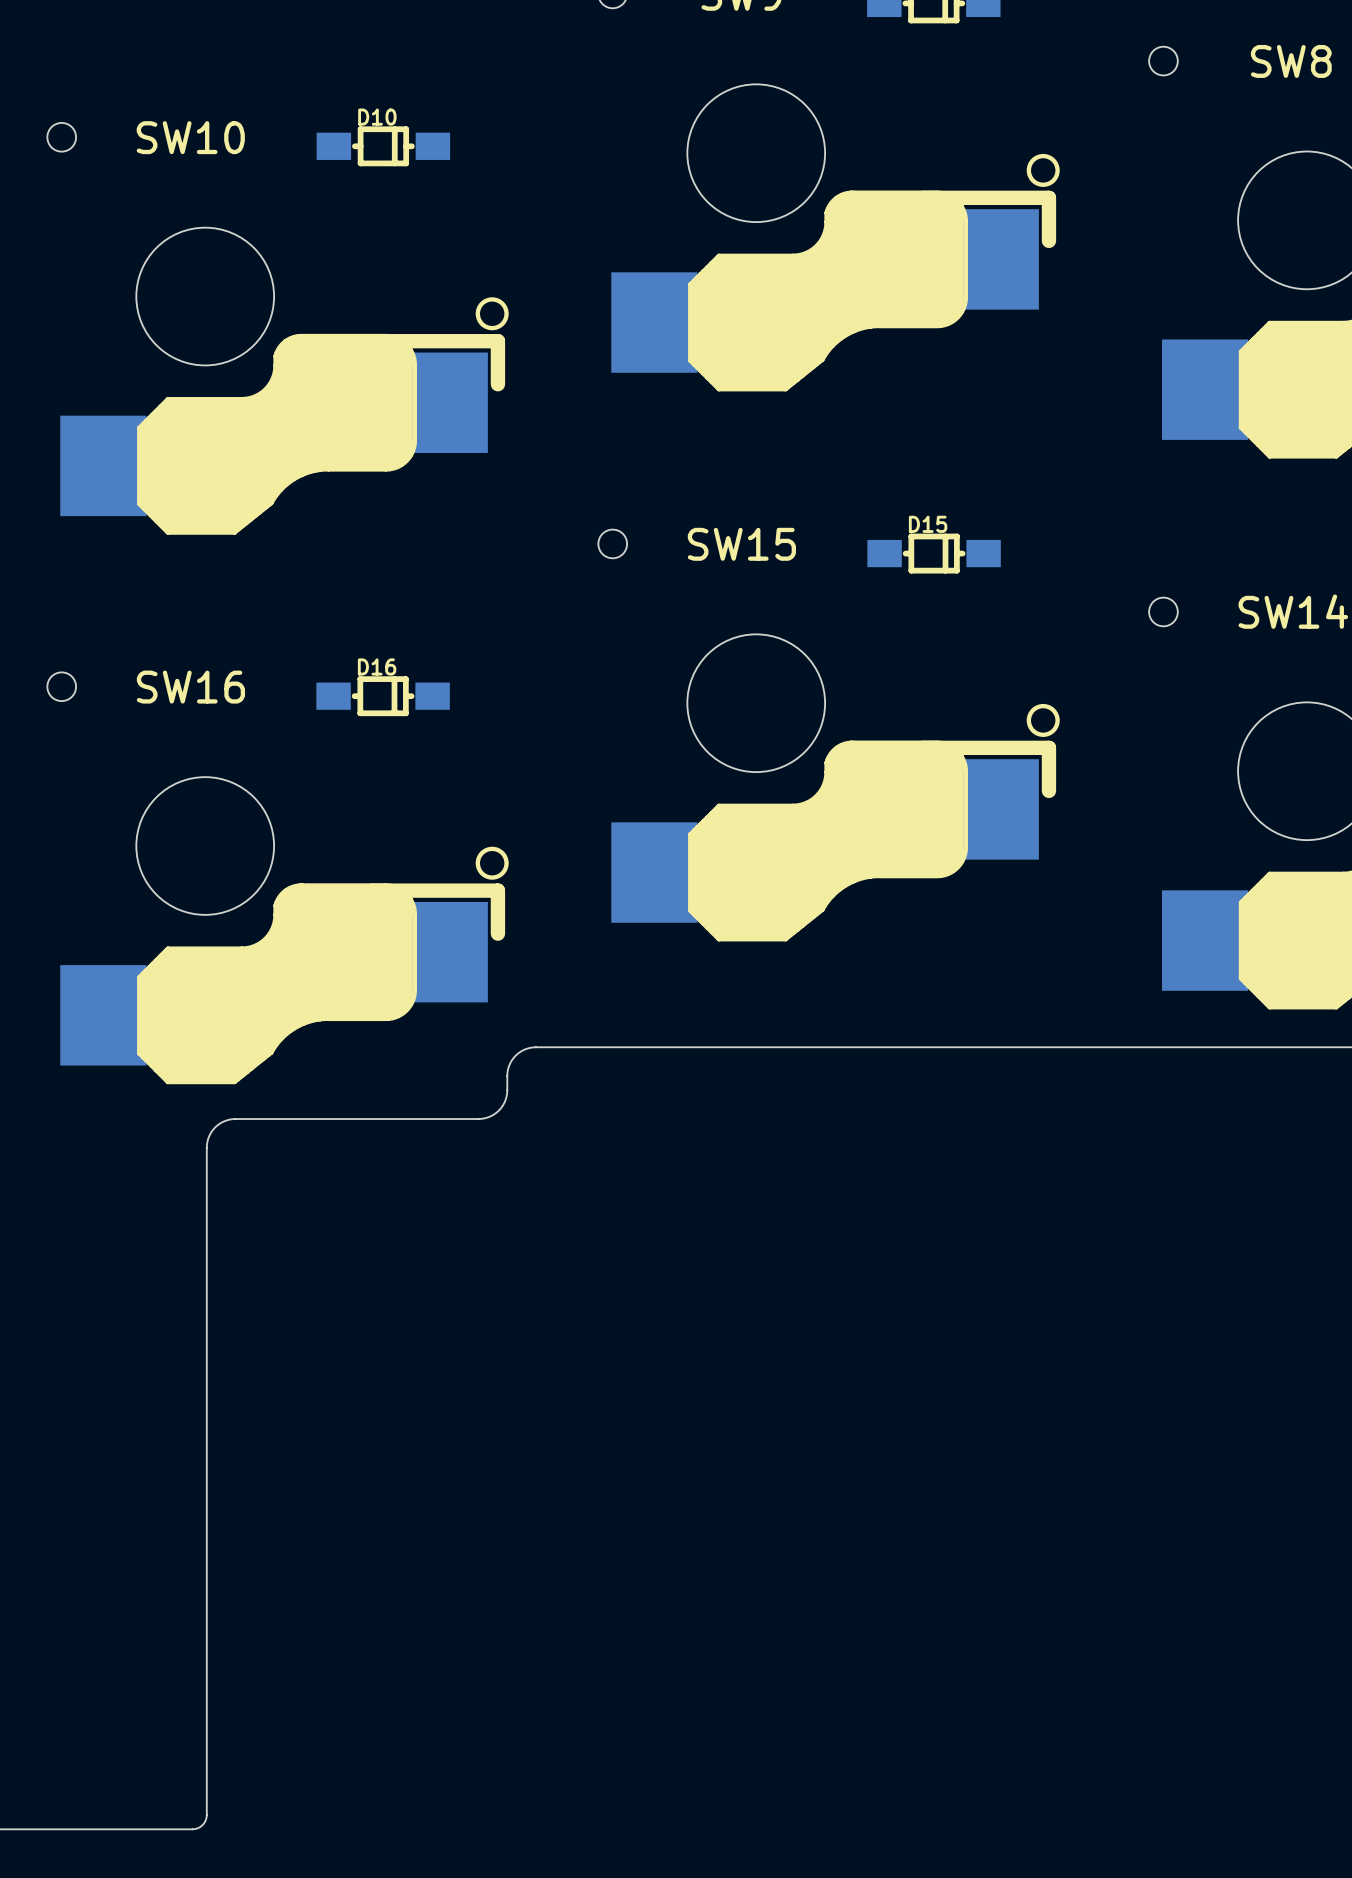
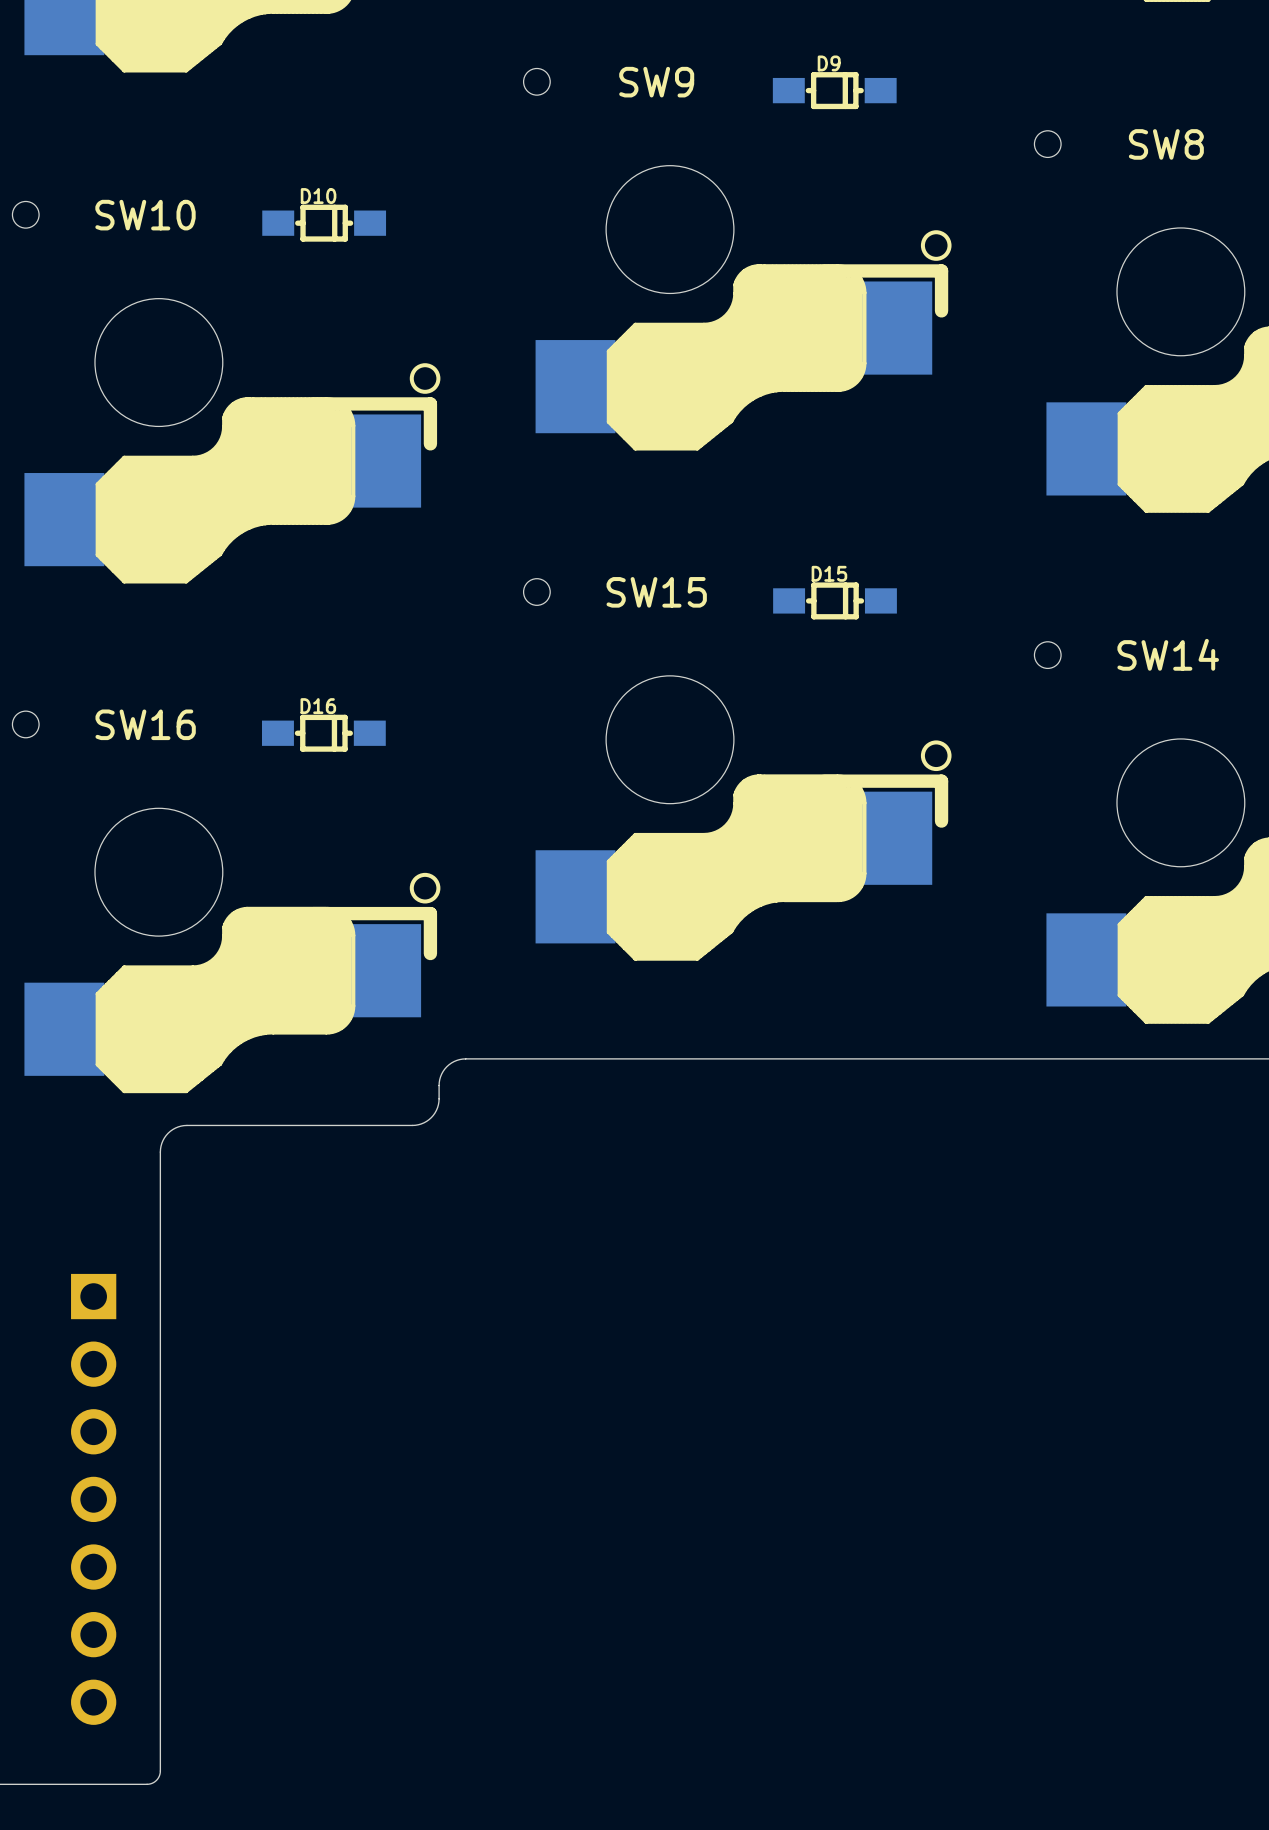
part: none -> (93, 1499)

